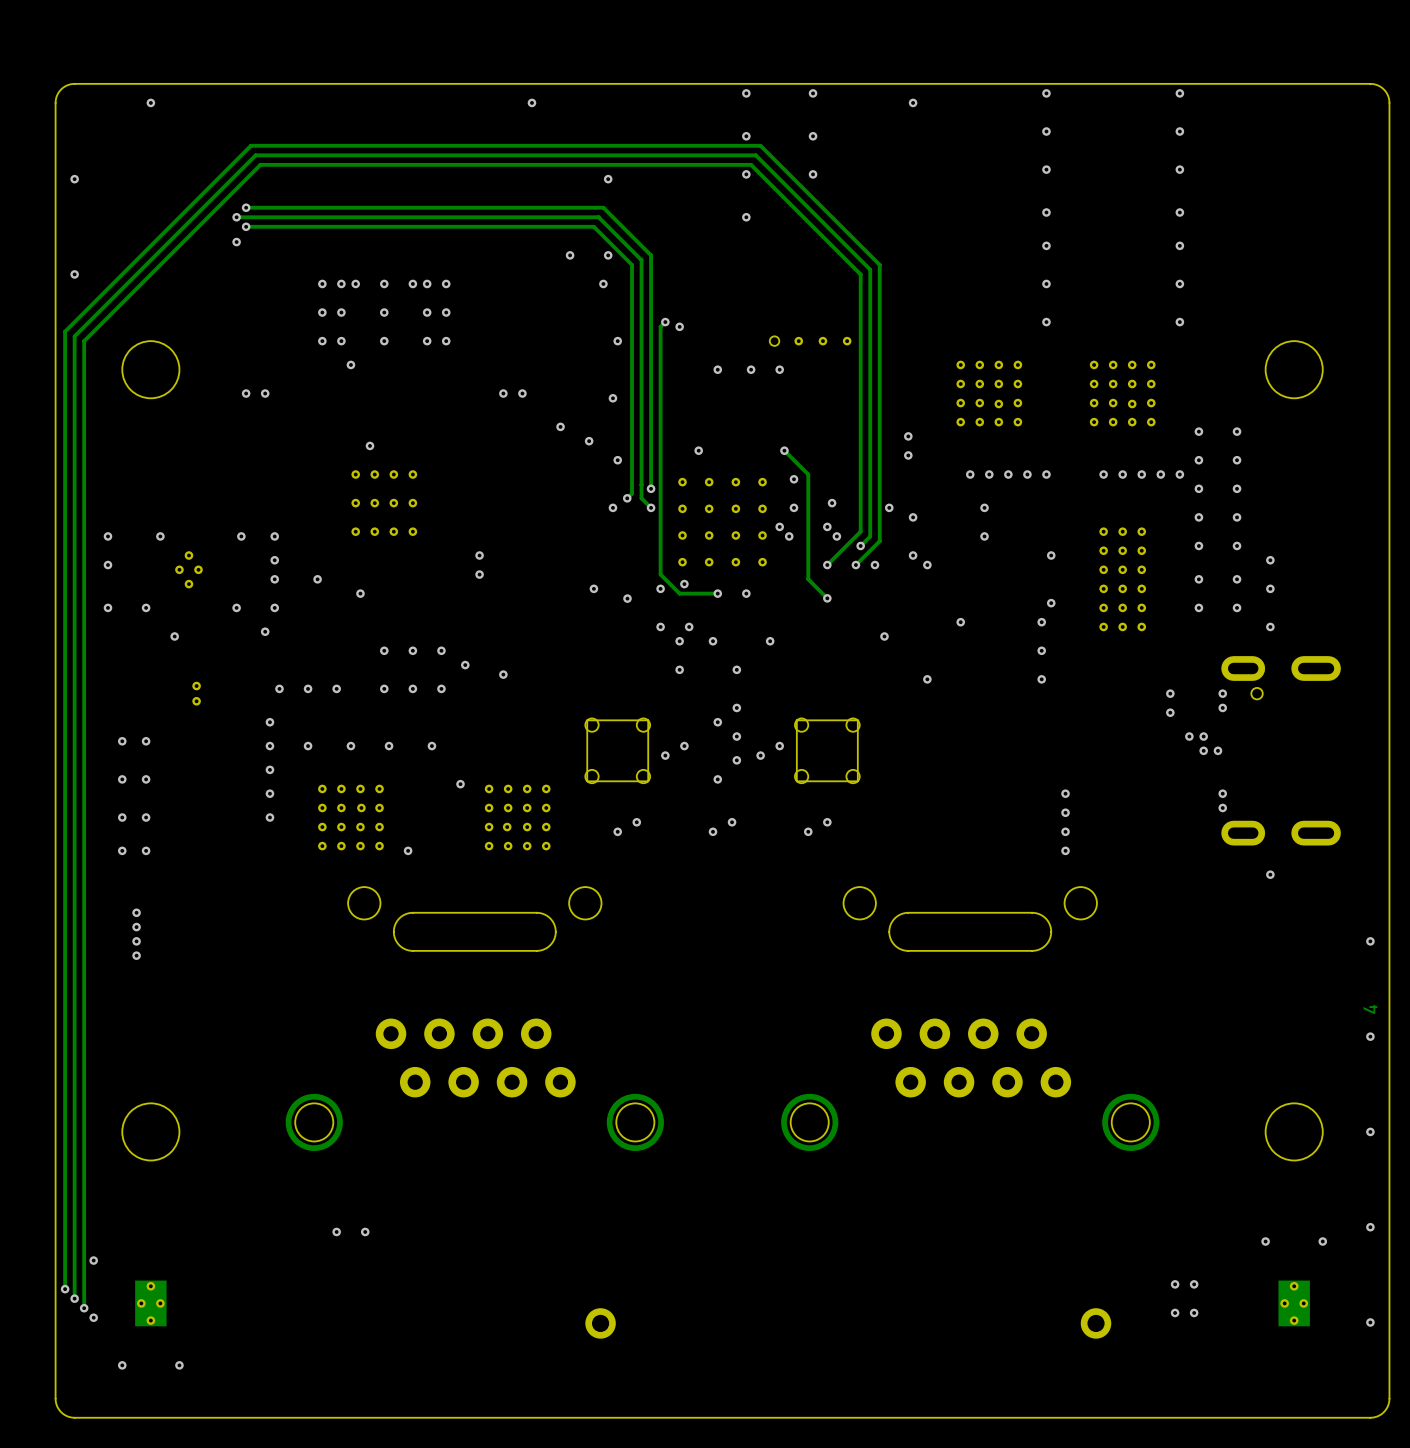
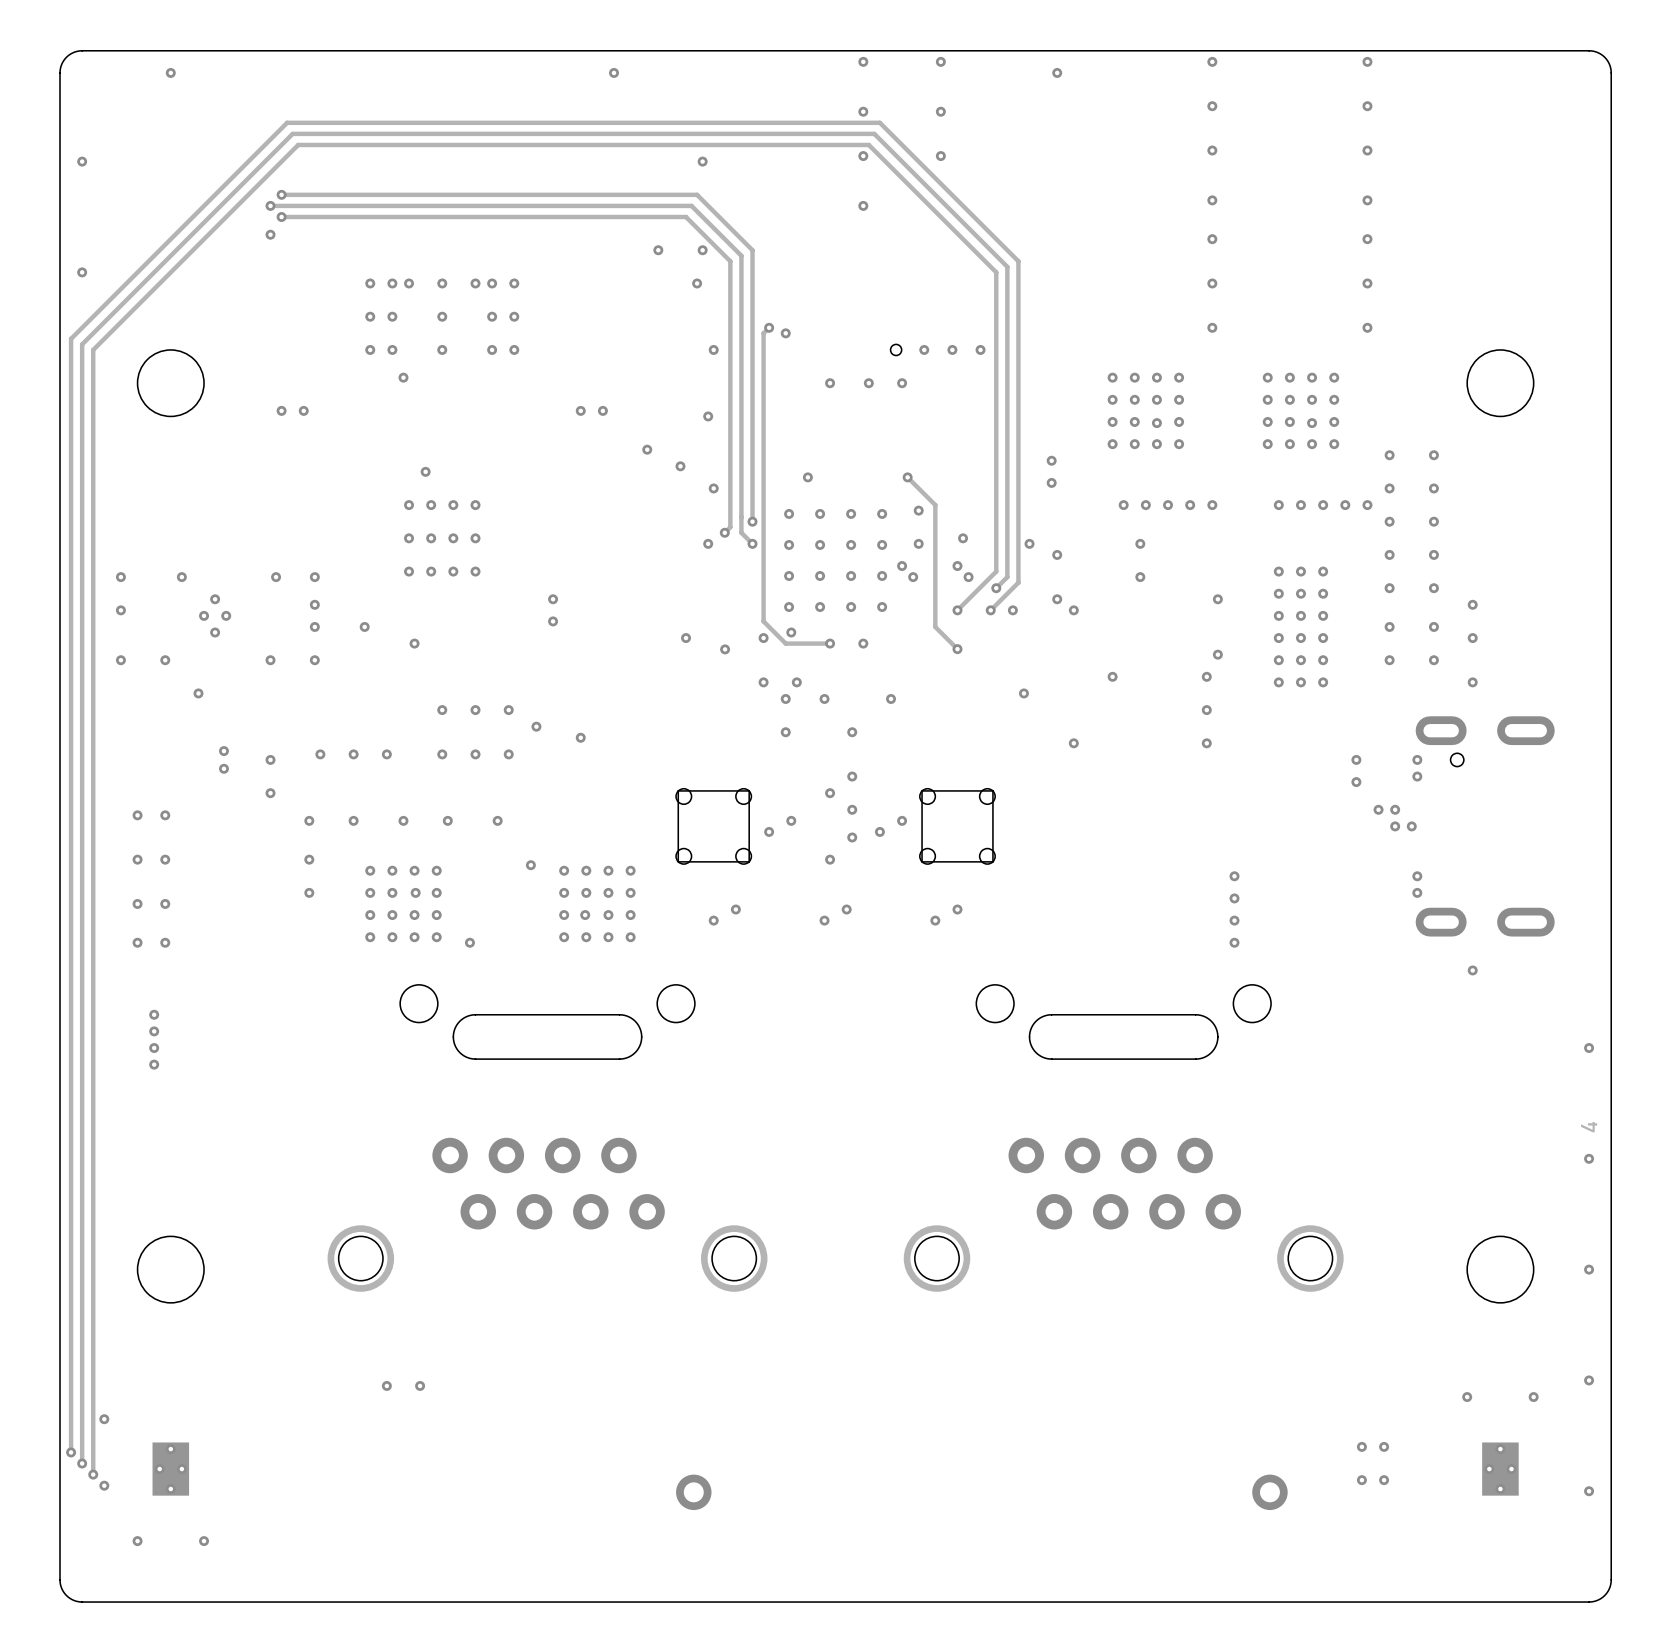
via: (265, 631) -> none
via: none -> (270, 759)
via: none -> (270, 793)
via: (269, 722) -> none
via: (269, 769) -> none
via: none -> (309, 859)
via: (269, 793) -> none
via: none -> (309, 892)
via: (269, 817) -> none

